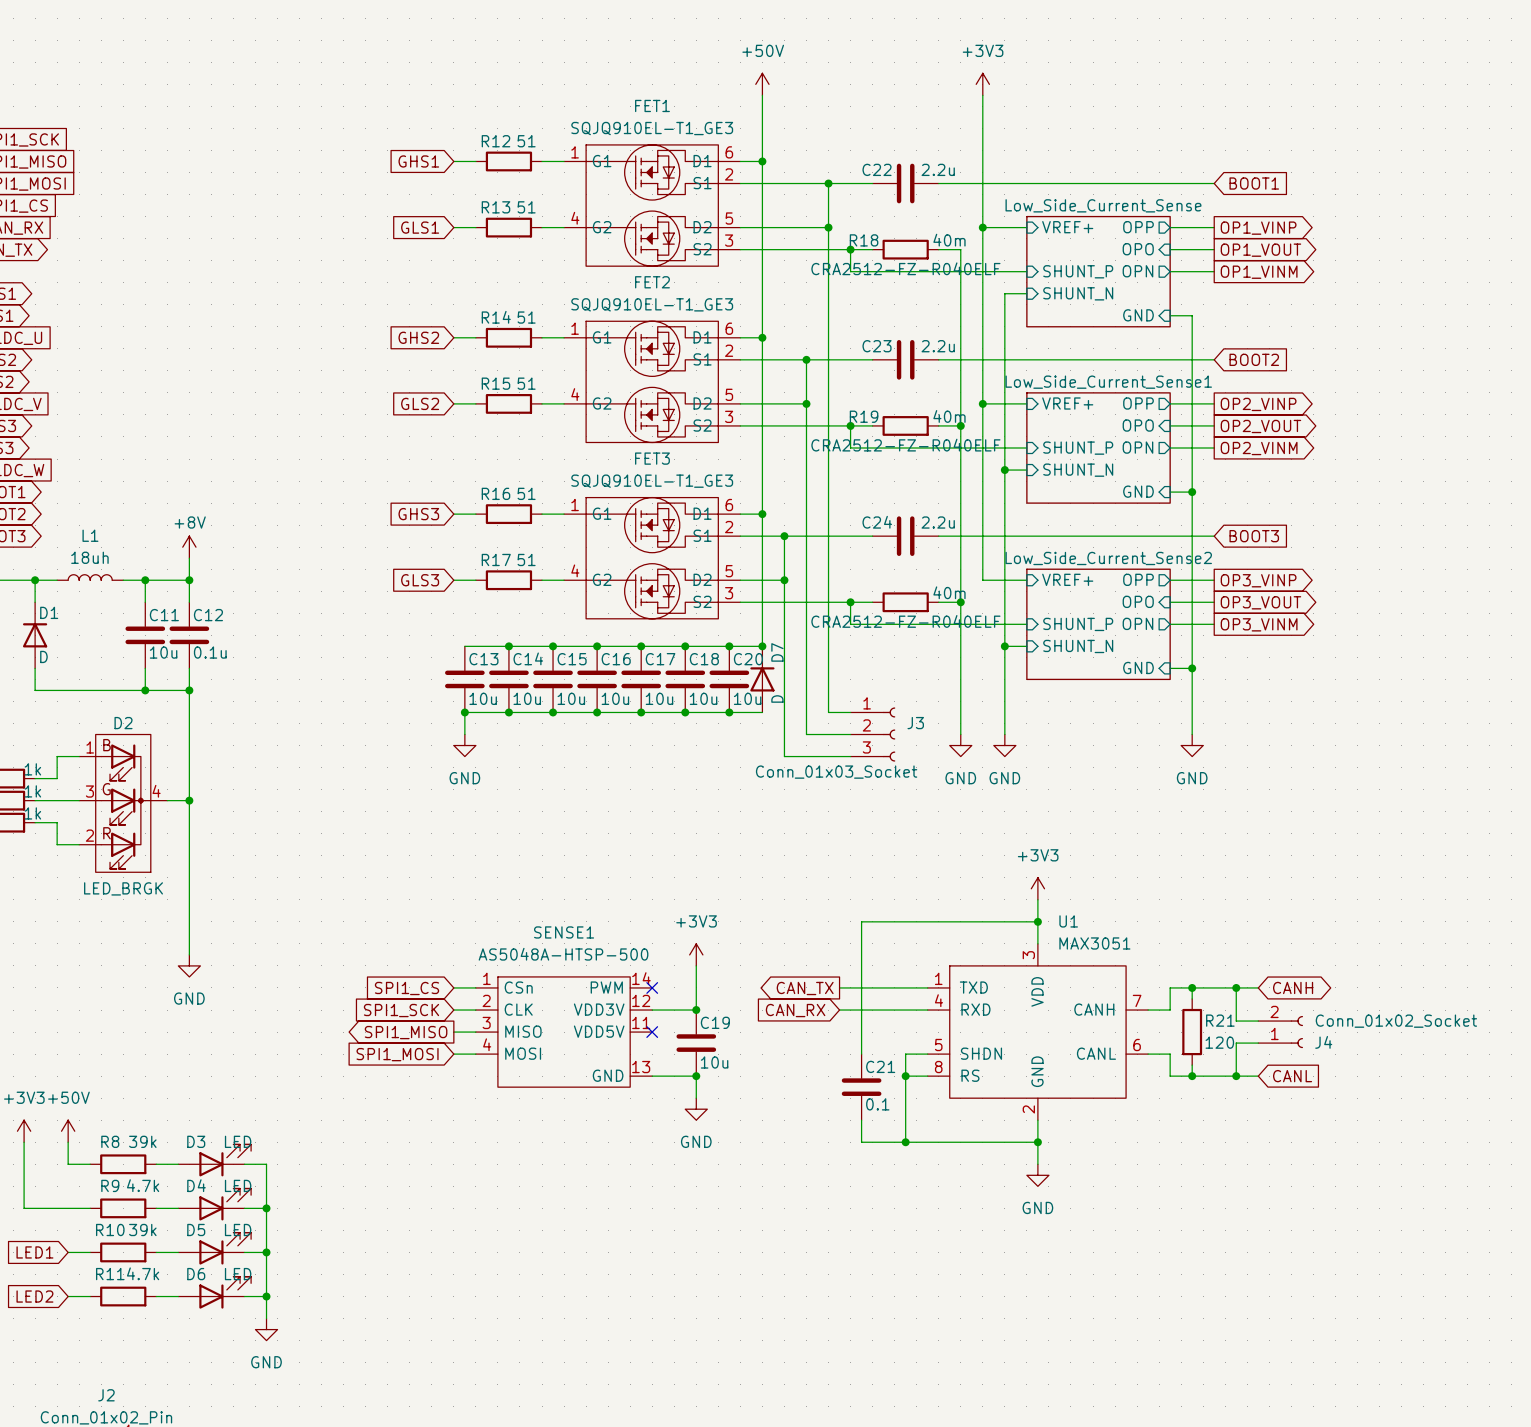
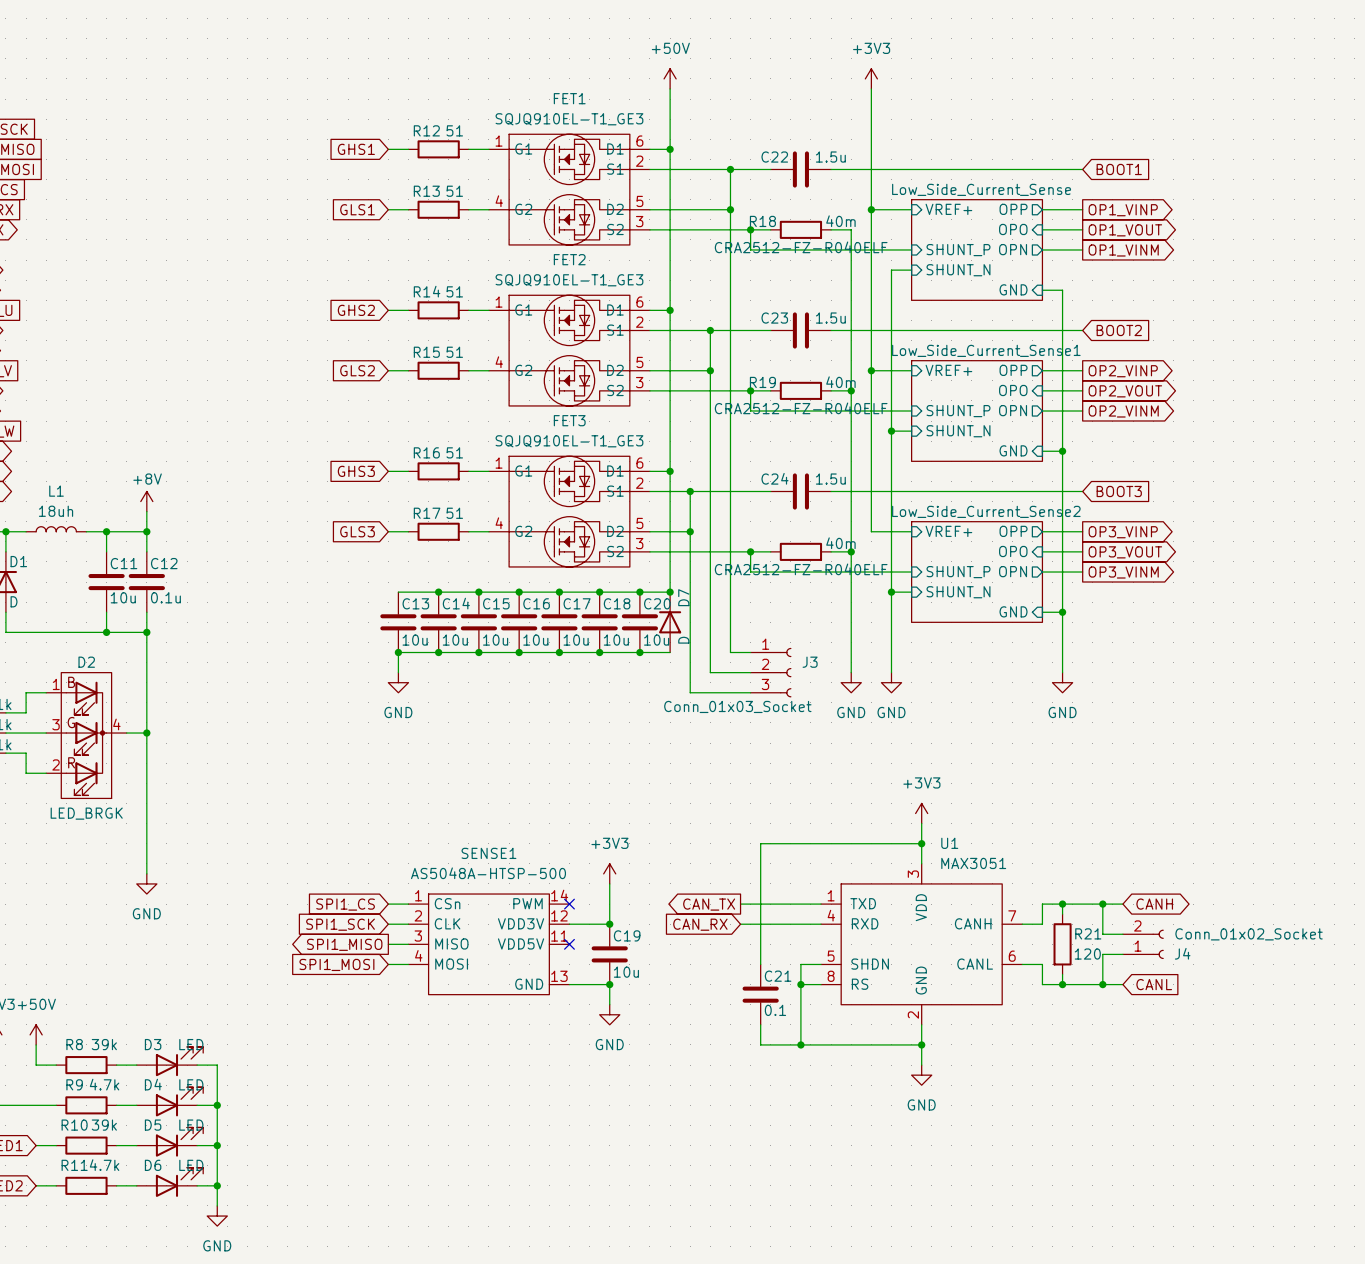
C22 value: 2.2u (938, 169) -> 1.5u (830, 157)
C23 value: 2.2u (938, 346) -> 1.5u (830, 318)
C24 value: 2.2u (938, 522) -> 1.5u (830, 479)

